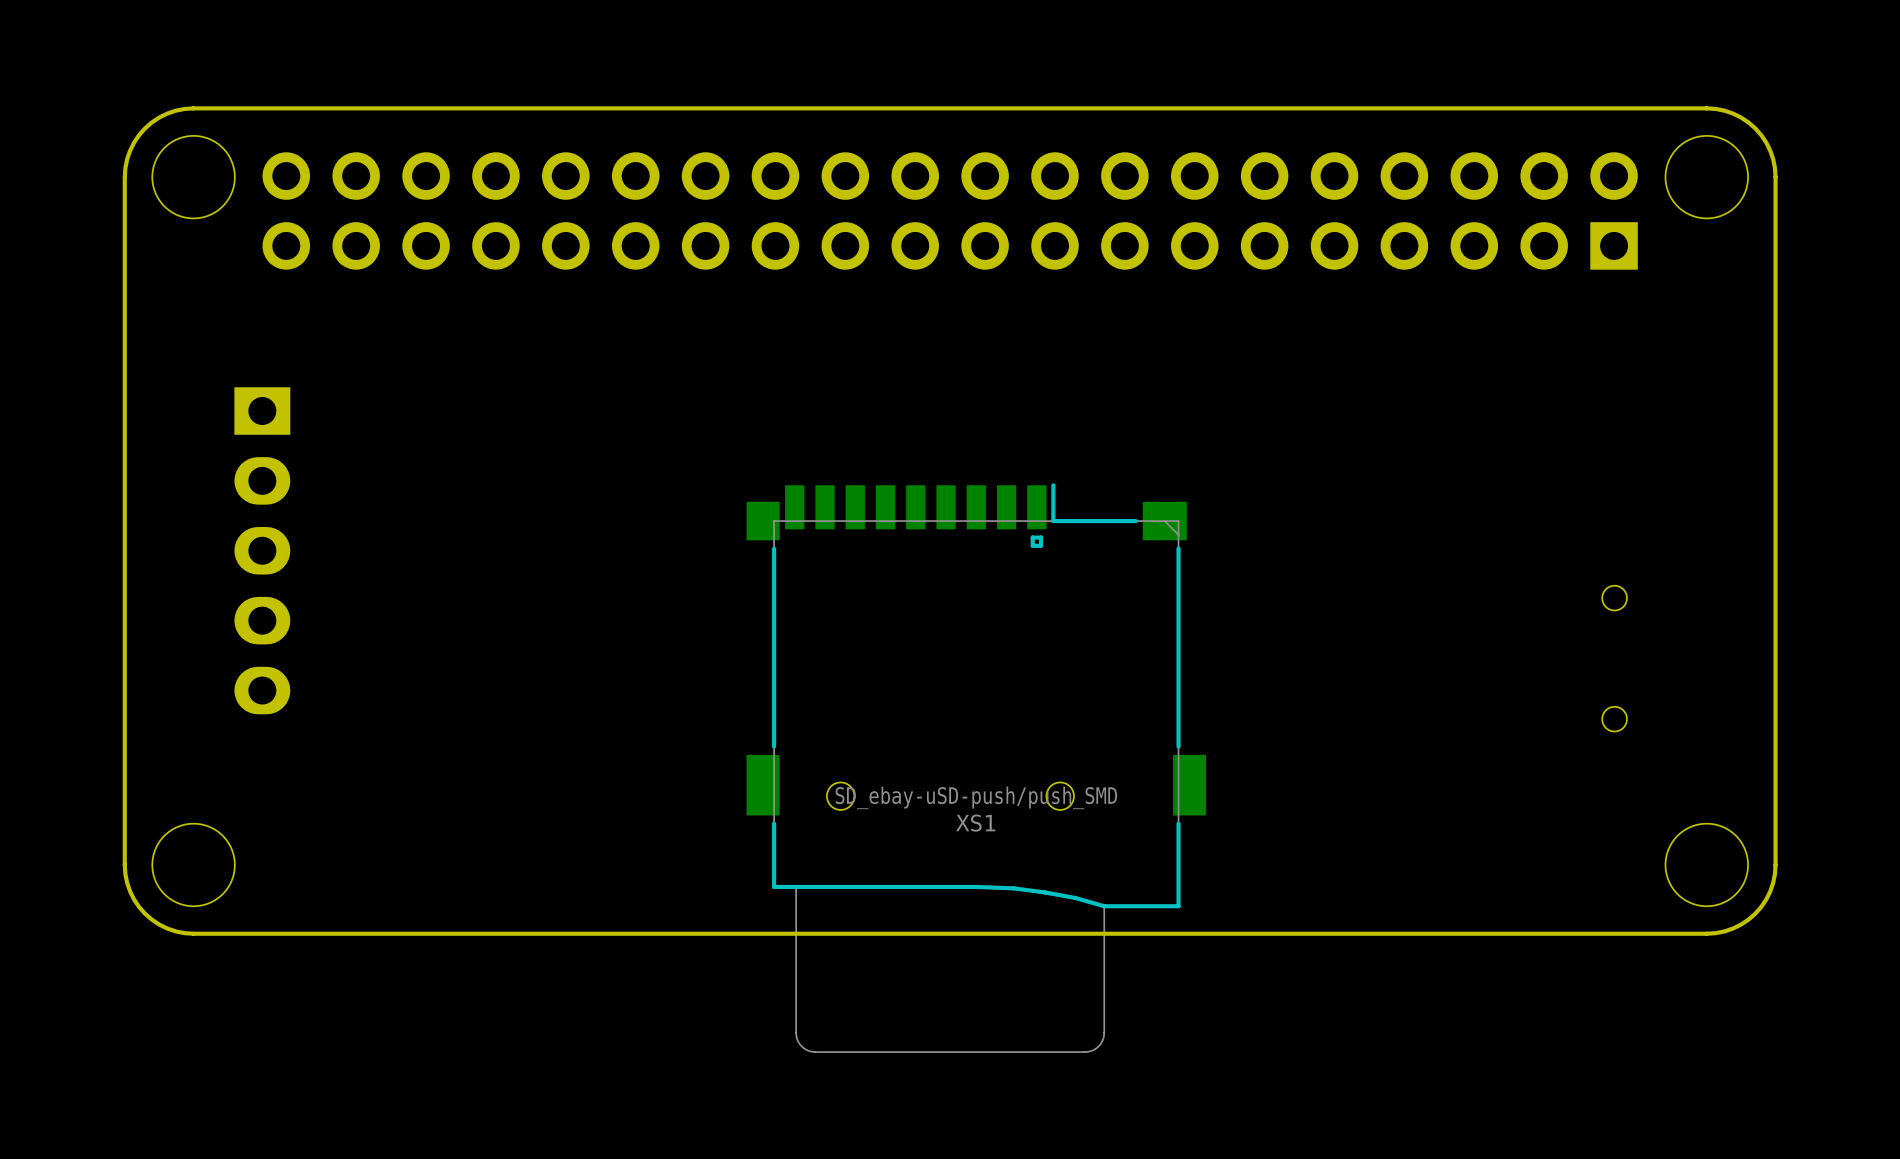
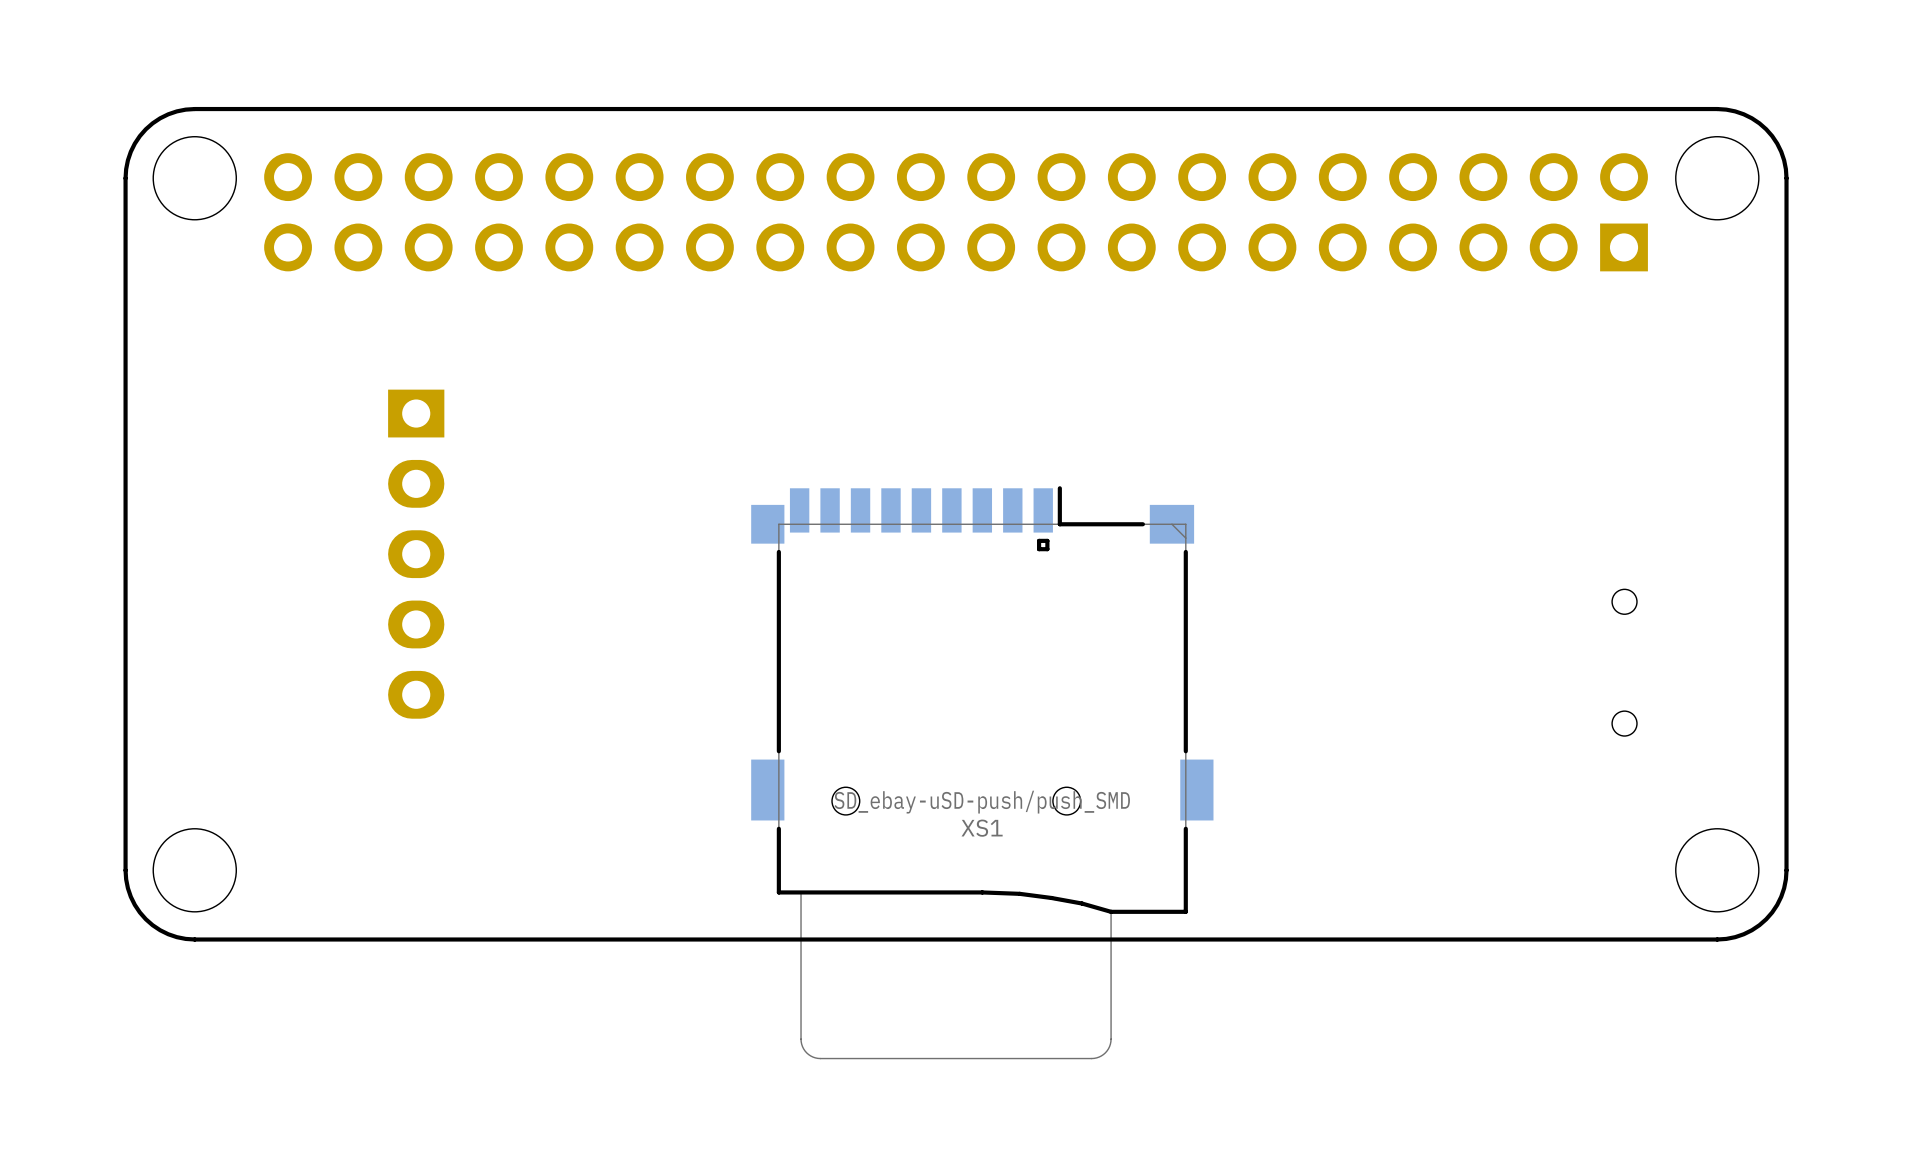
part position: (262, 550) -> (416, 554)

